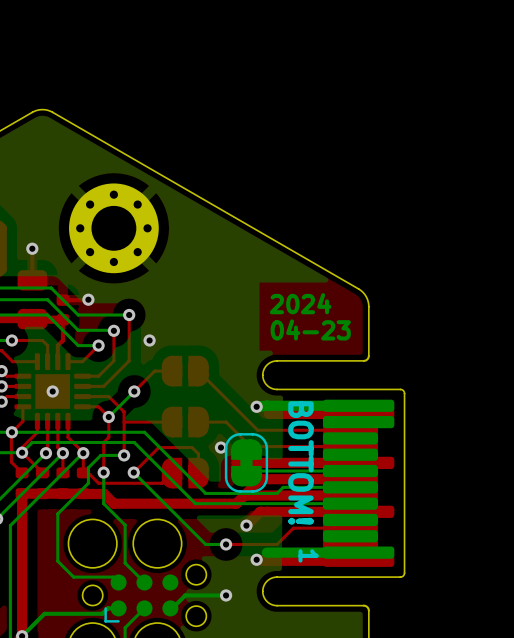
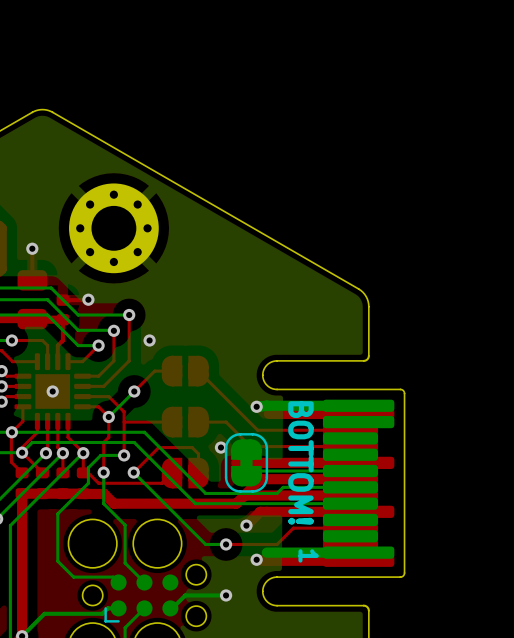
text: 2024 (300, 303) -> none
text: 04-23 (310, 329) -> none

